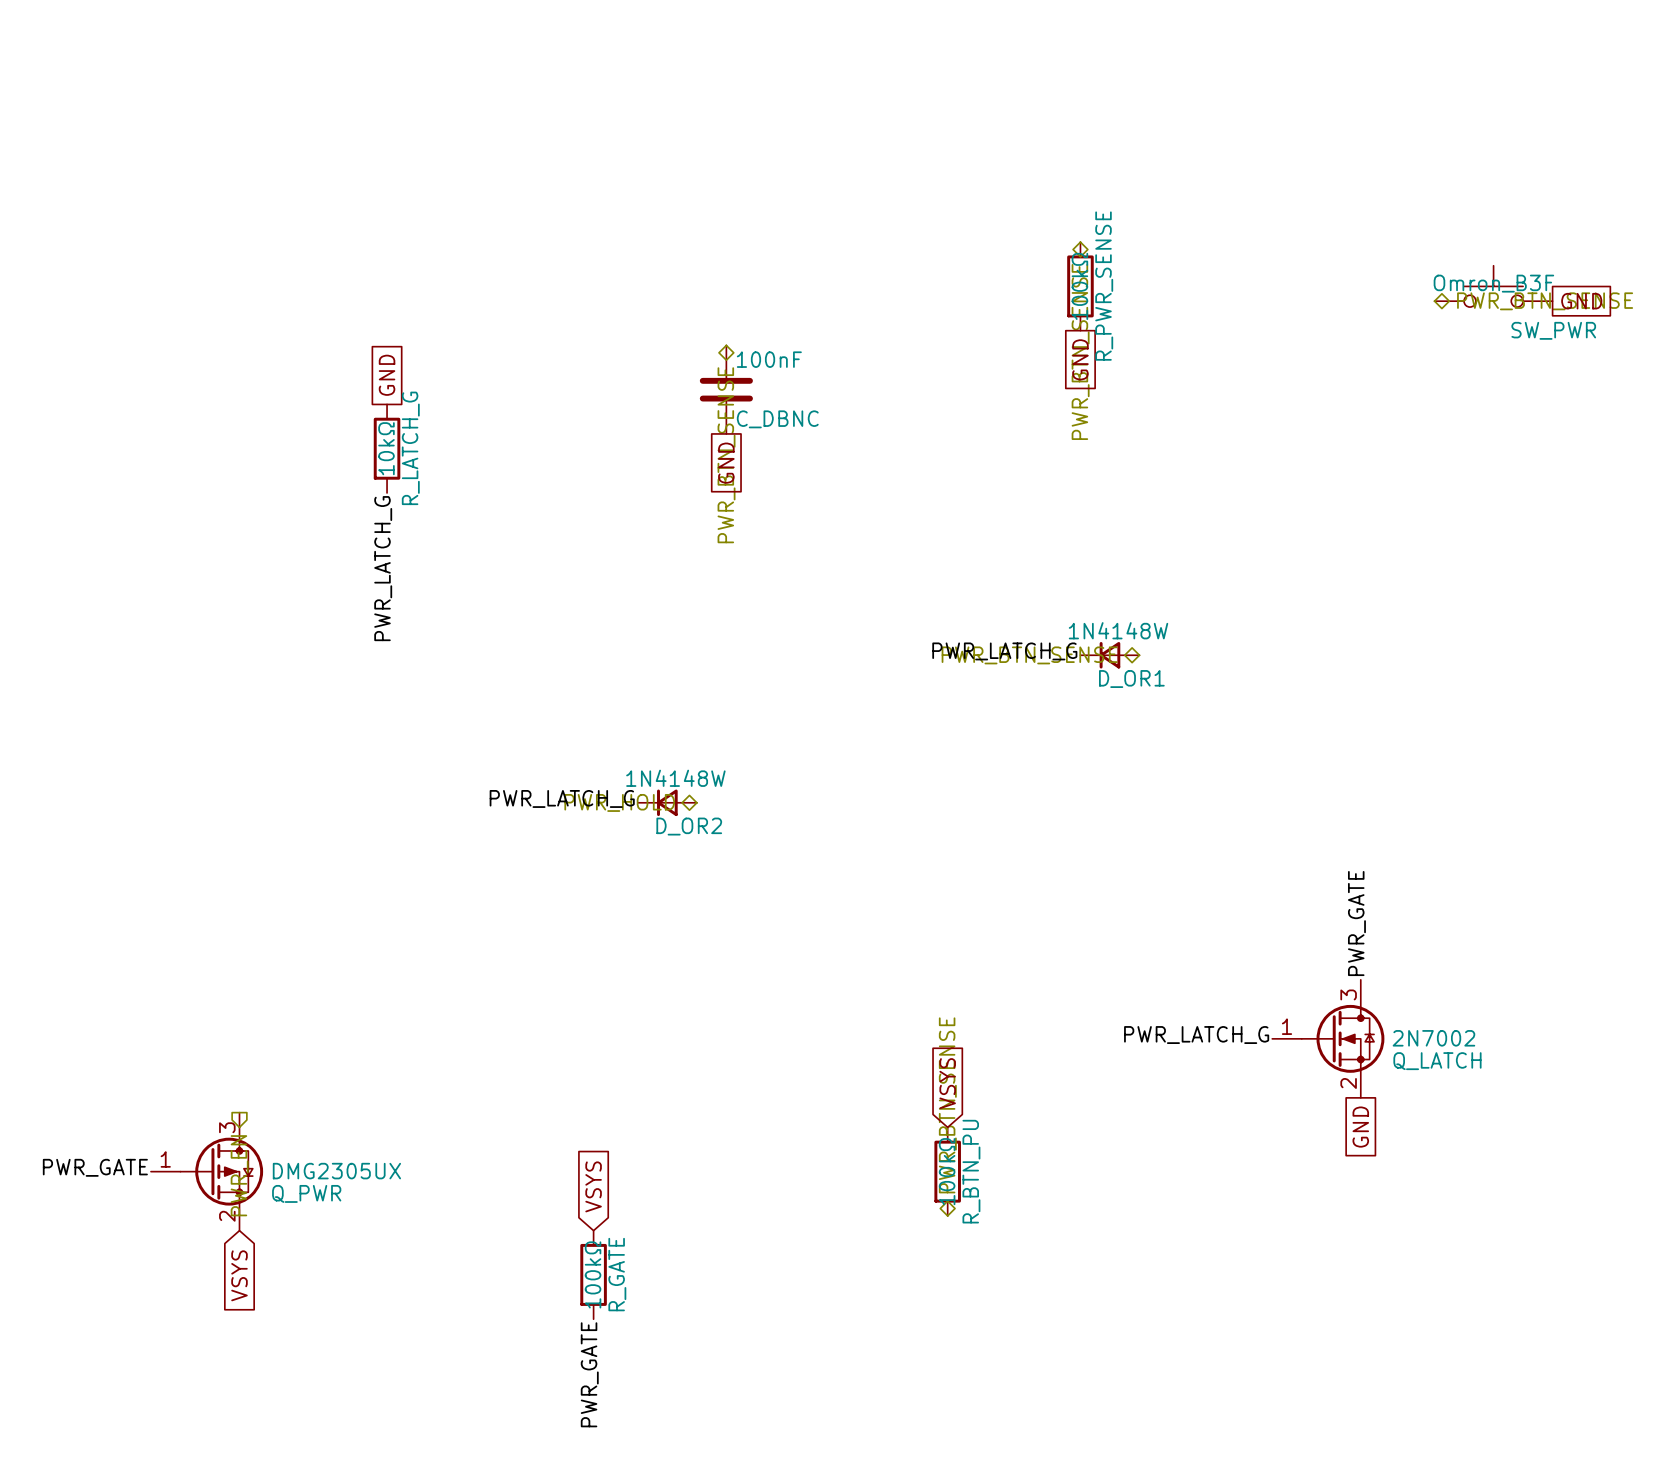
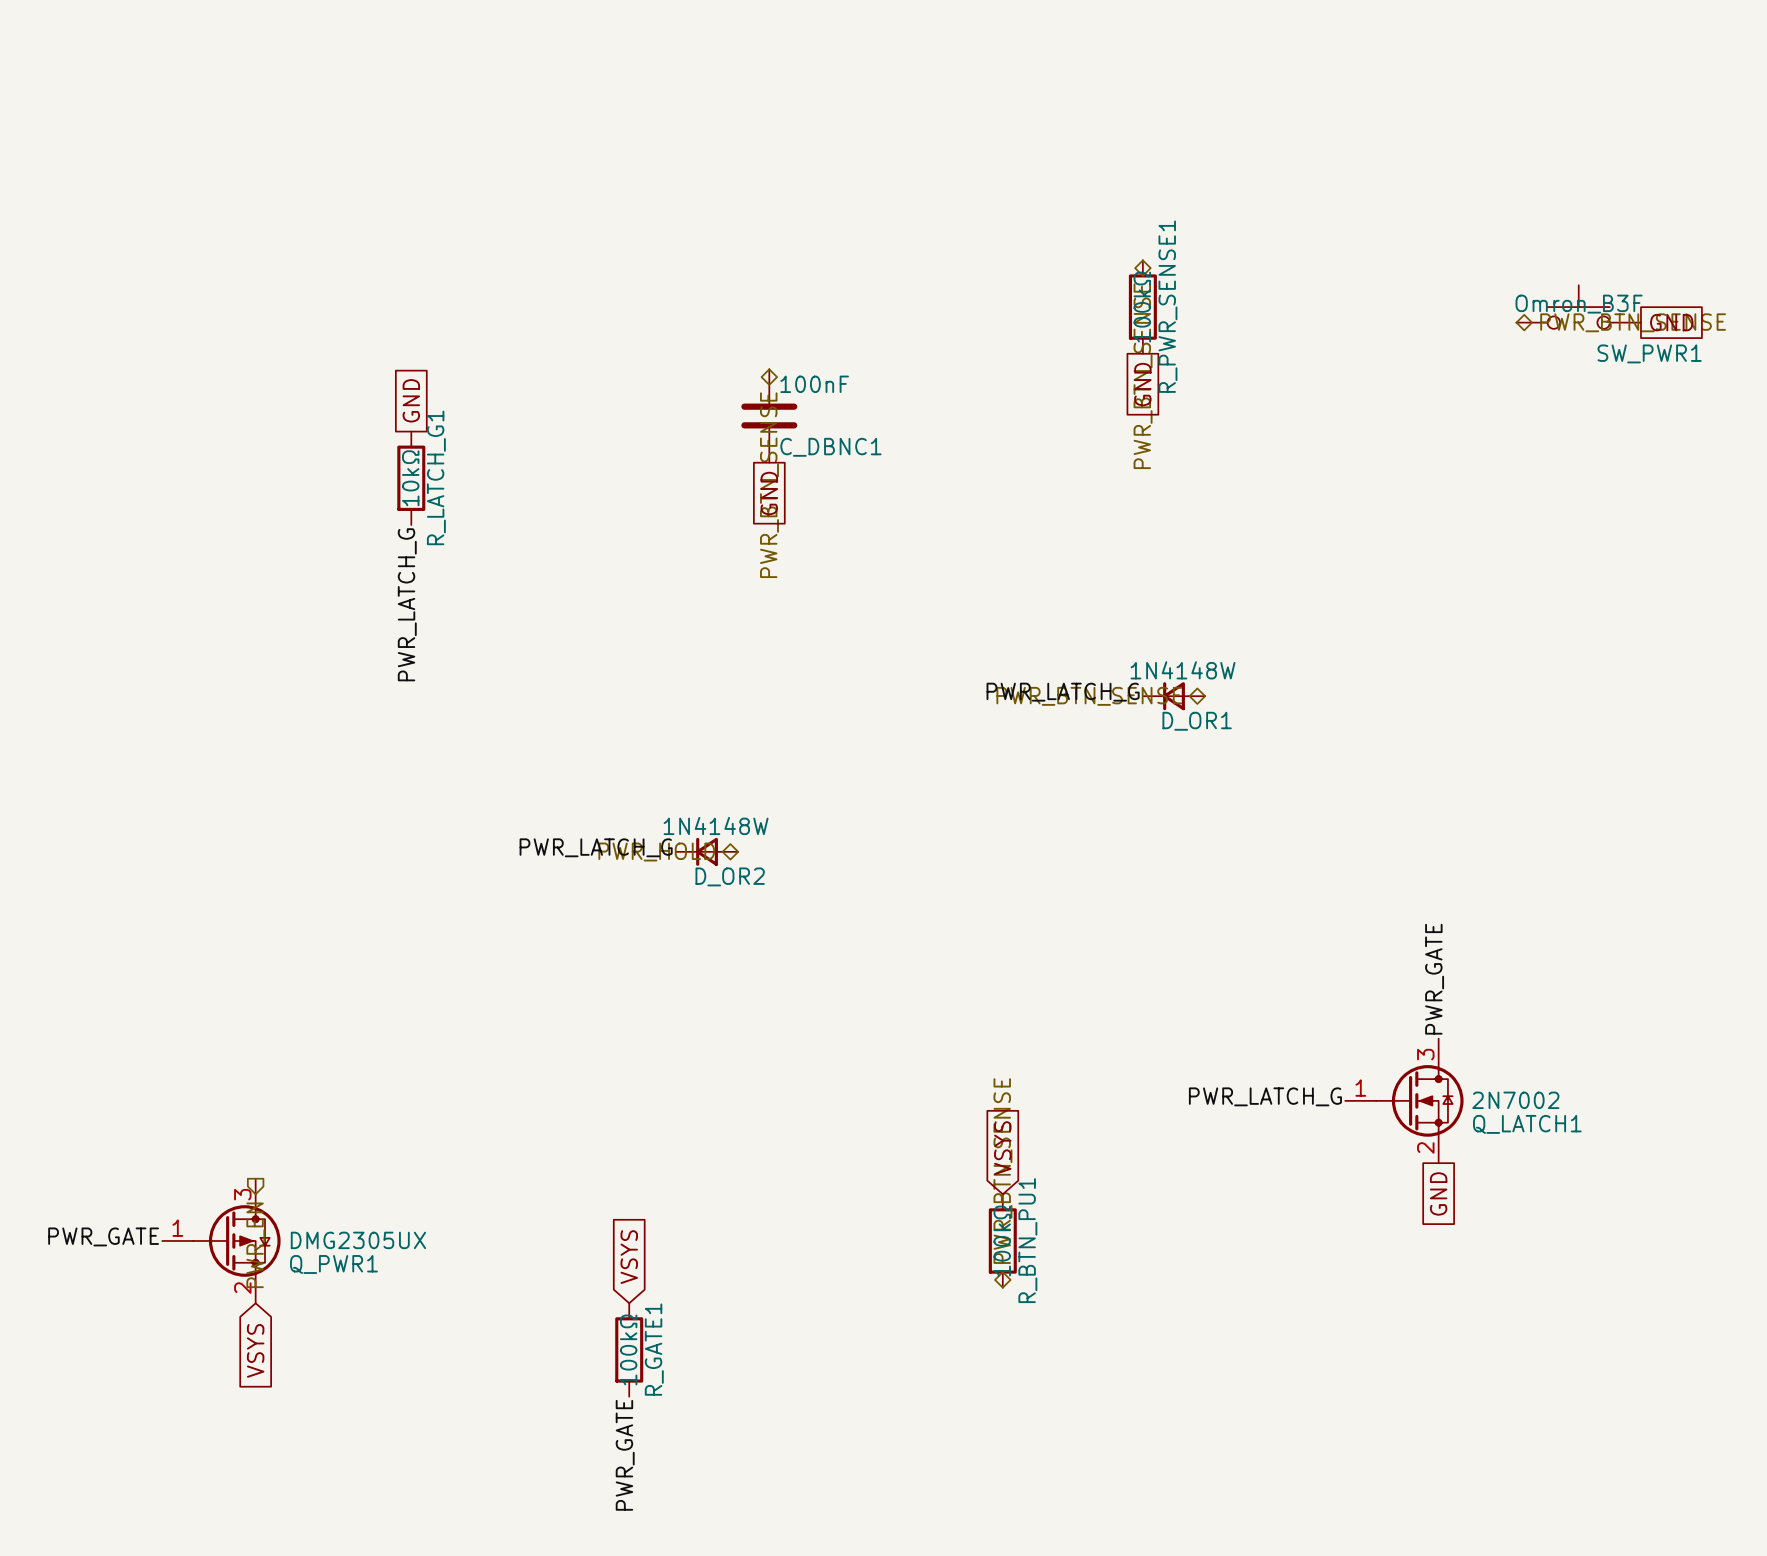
R_PWR_SENSE name: R_PWR_SENSE (1104, 286) -> R_PWR_SENSE1 (1167, 306)
SW_PWR name: SW_PWR (1553, 330) -> SW_PWR1 (1649, 353)
C_DBNC name: C_DBNC (777, 419) -> C_DBNC1 (830, 447)
R_LATCH_G name: R_LATCH_G (410, 448) -> R_LATCH_G1 (436, 477)
Q_LATCH name: Q_LATCH (1437, 1061) -> Q_LATCH1 (1527, 1124)
R_BTN_PU name: R_BTN_PU (971, 1171) -> R_BTN_PU1 (1027, 1240)
Q_PWR name: Q_PWR (306, 1193) -> Q_PWR1 (333, 1264)
R_GATE name: R_GATE (617, 1274) -> R_GATE1 (654, 1349)

